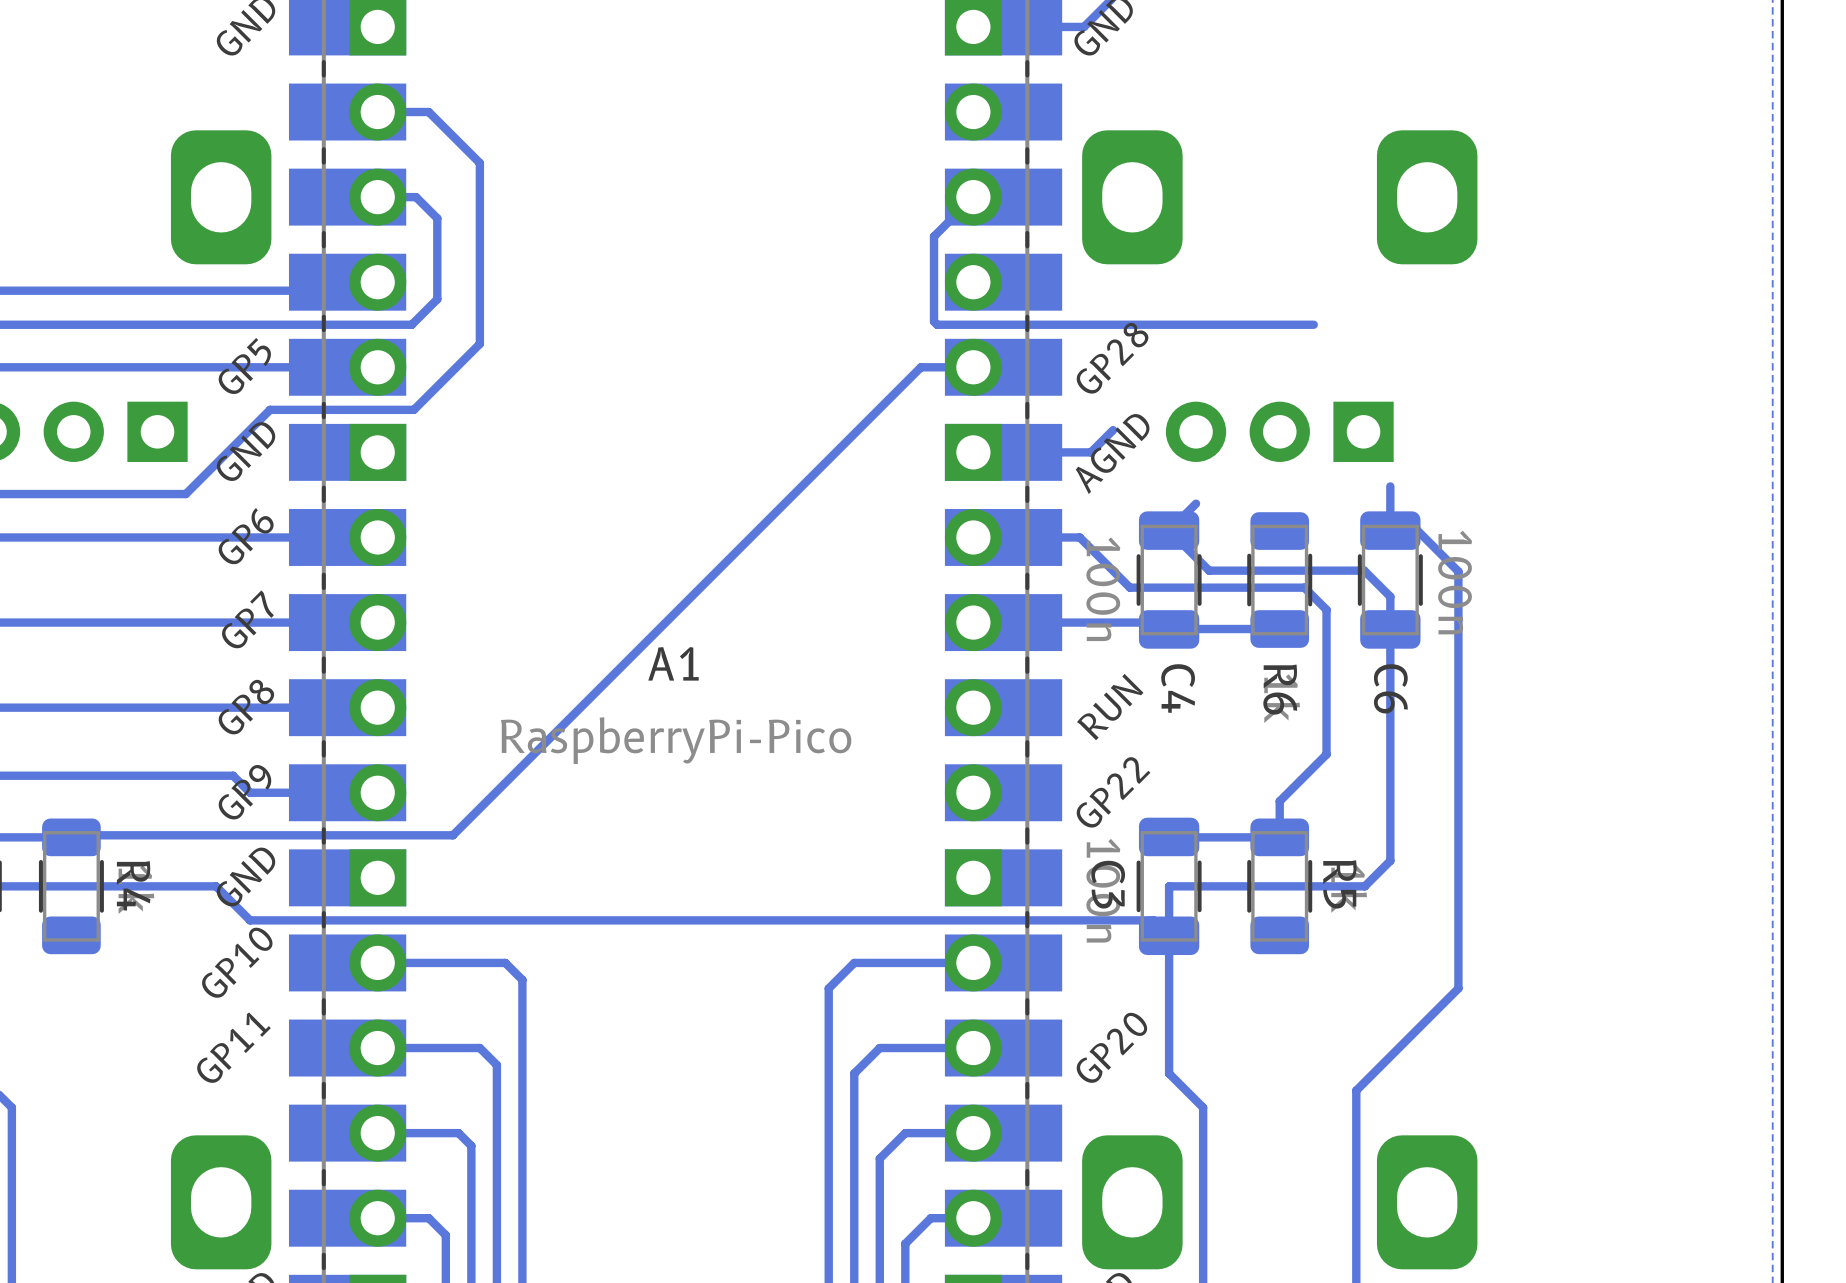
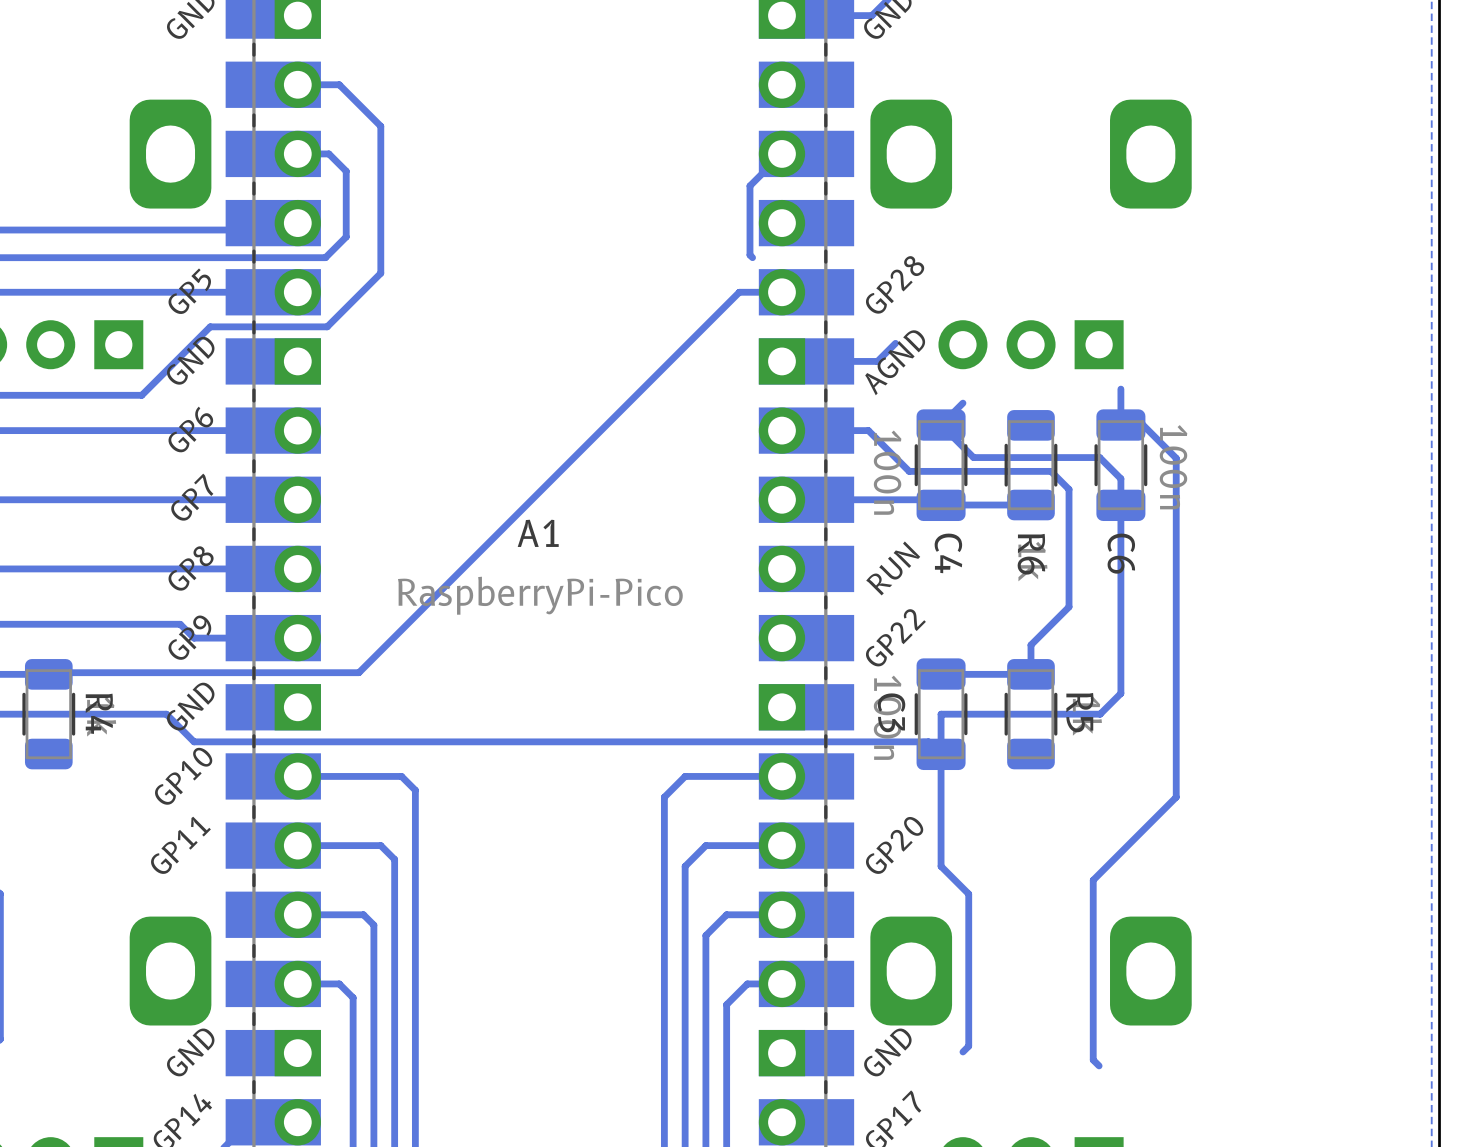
track: (1313, 324) (937, 324) -> none

